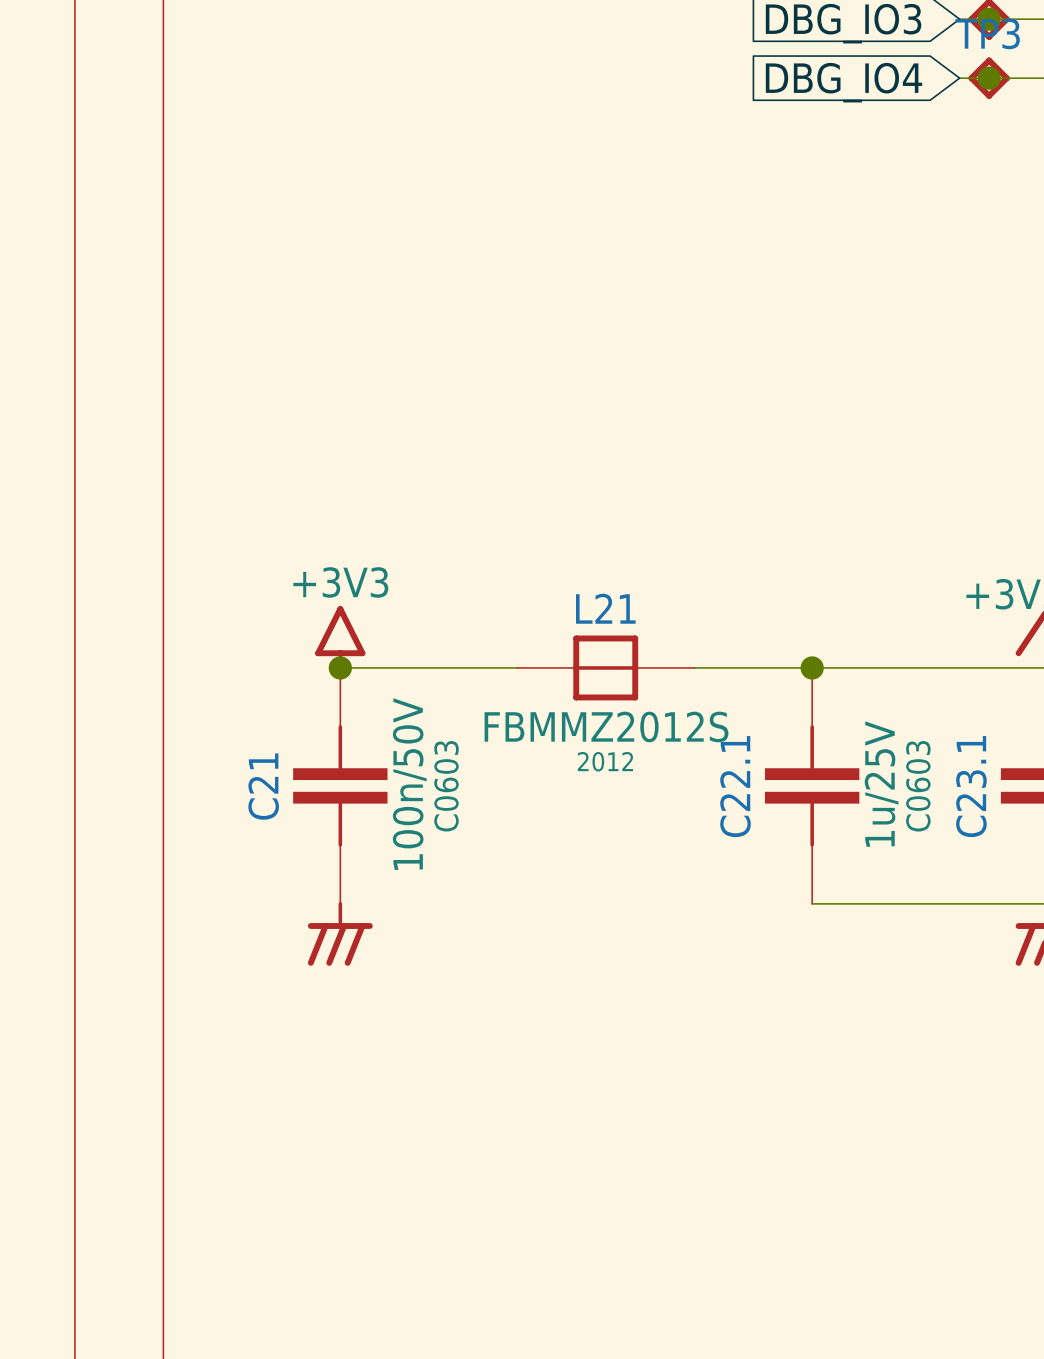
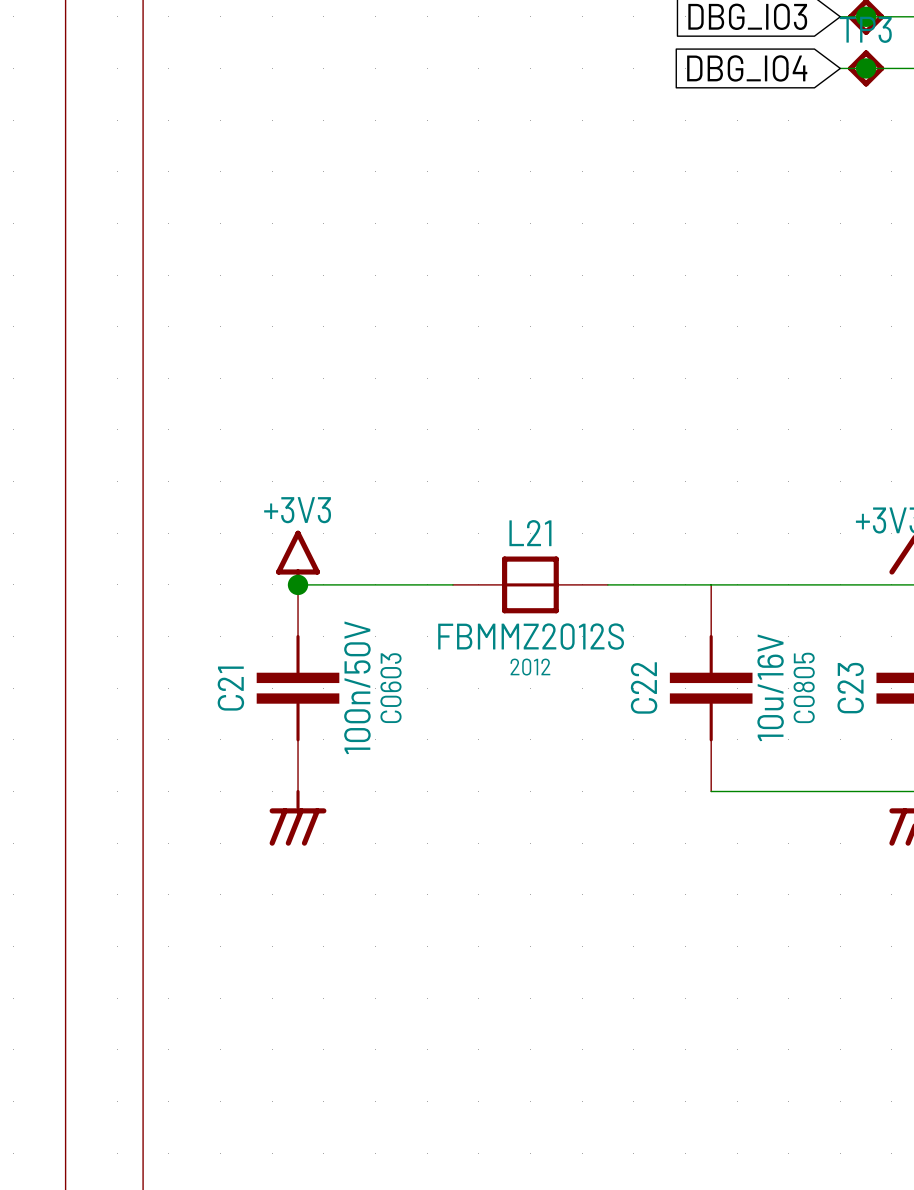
junction: (812, 667) -> none
C22.1 value: 1u/25V (881, 784) -> 10u/16V (770, 687)
C22.1 name: C22.1 (735, 786) -> C22 (644, 687)
C22.1 text: C0603 (918, 786) -> C0805 (804, 687)
C23.1 name: C23.1 (971, 786) -> C23 (850, 688)

